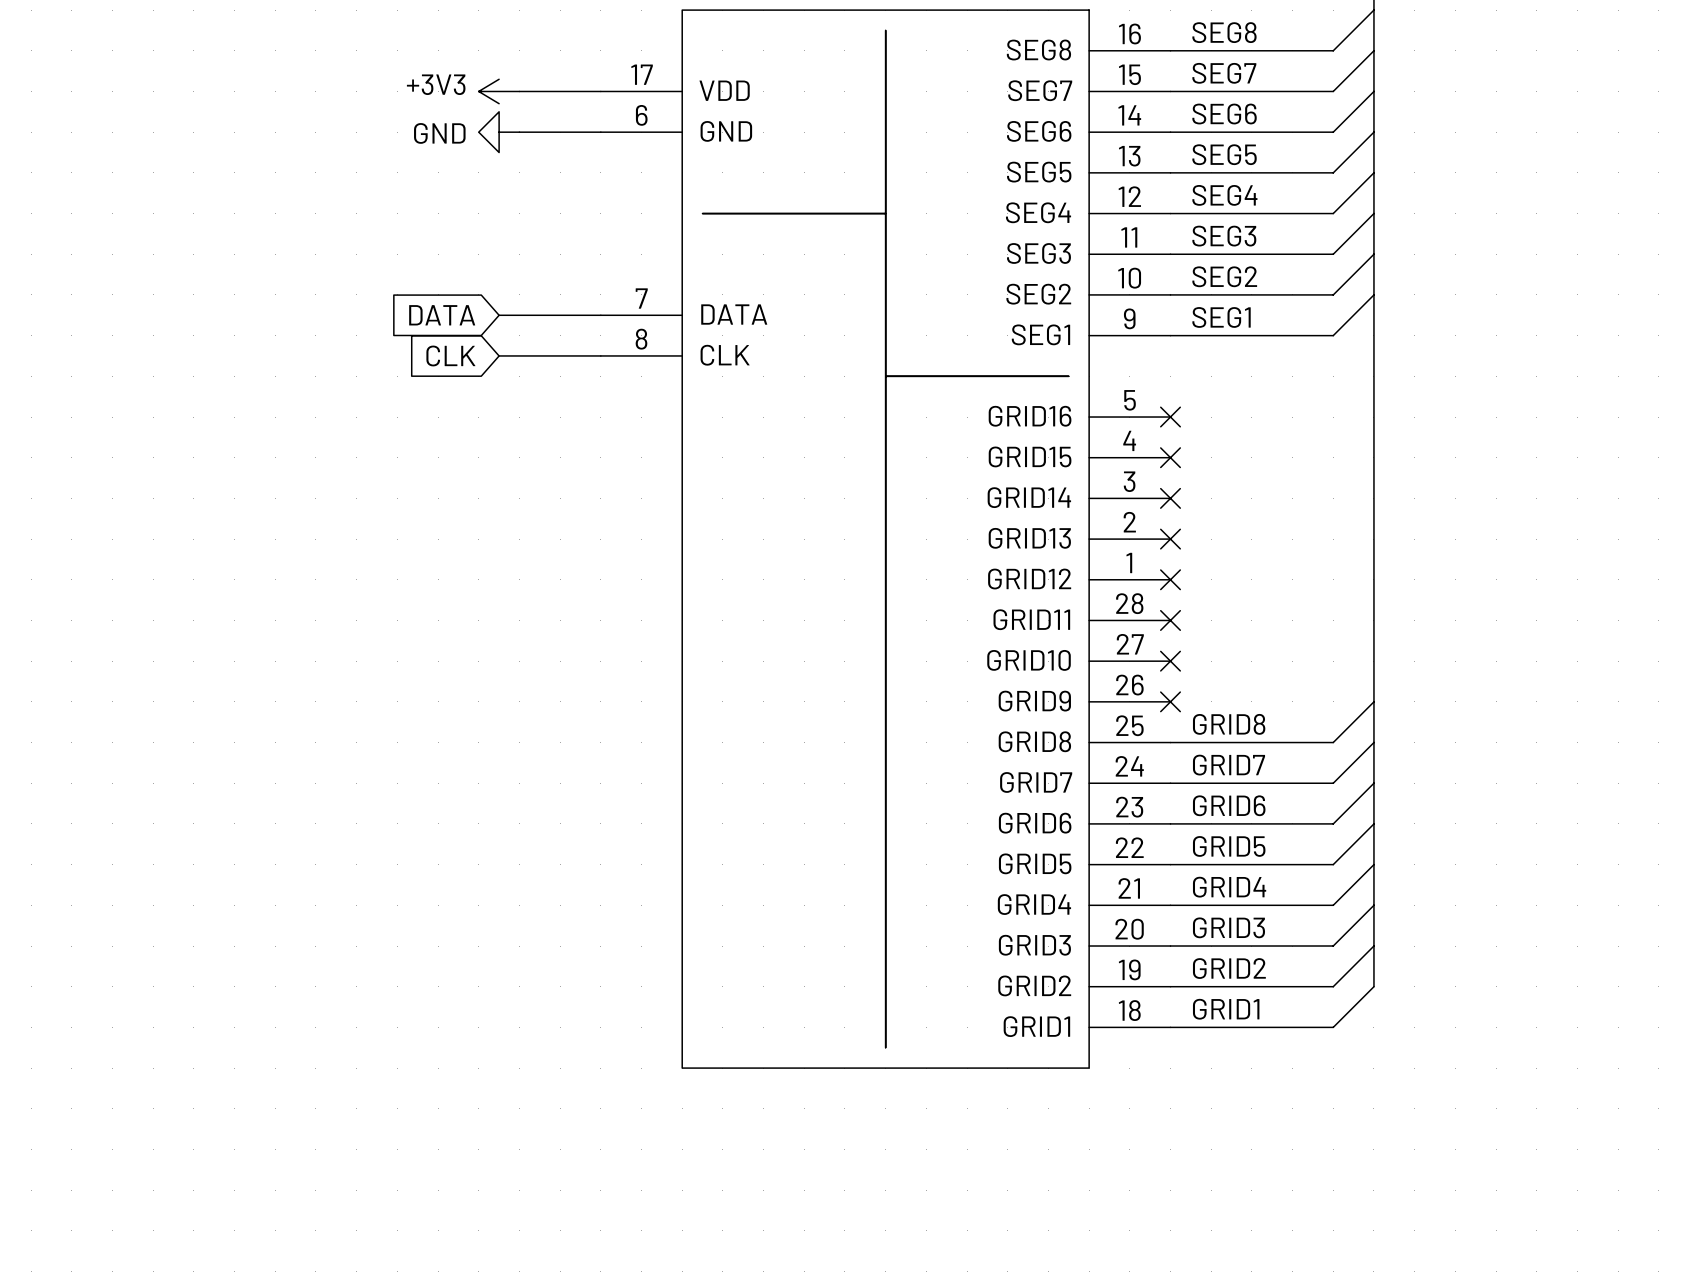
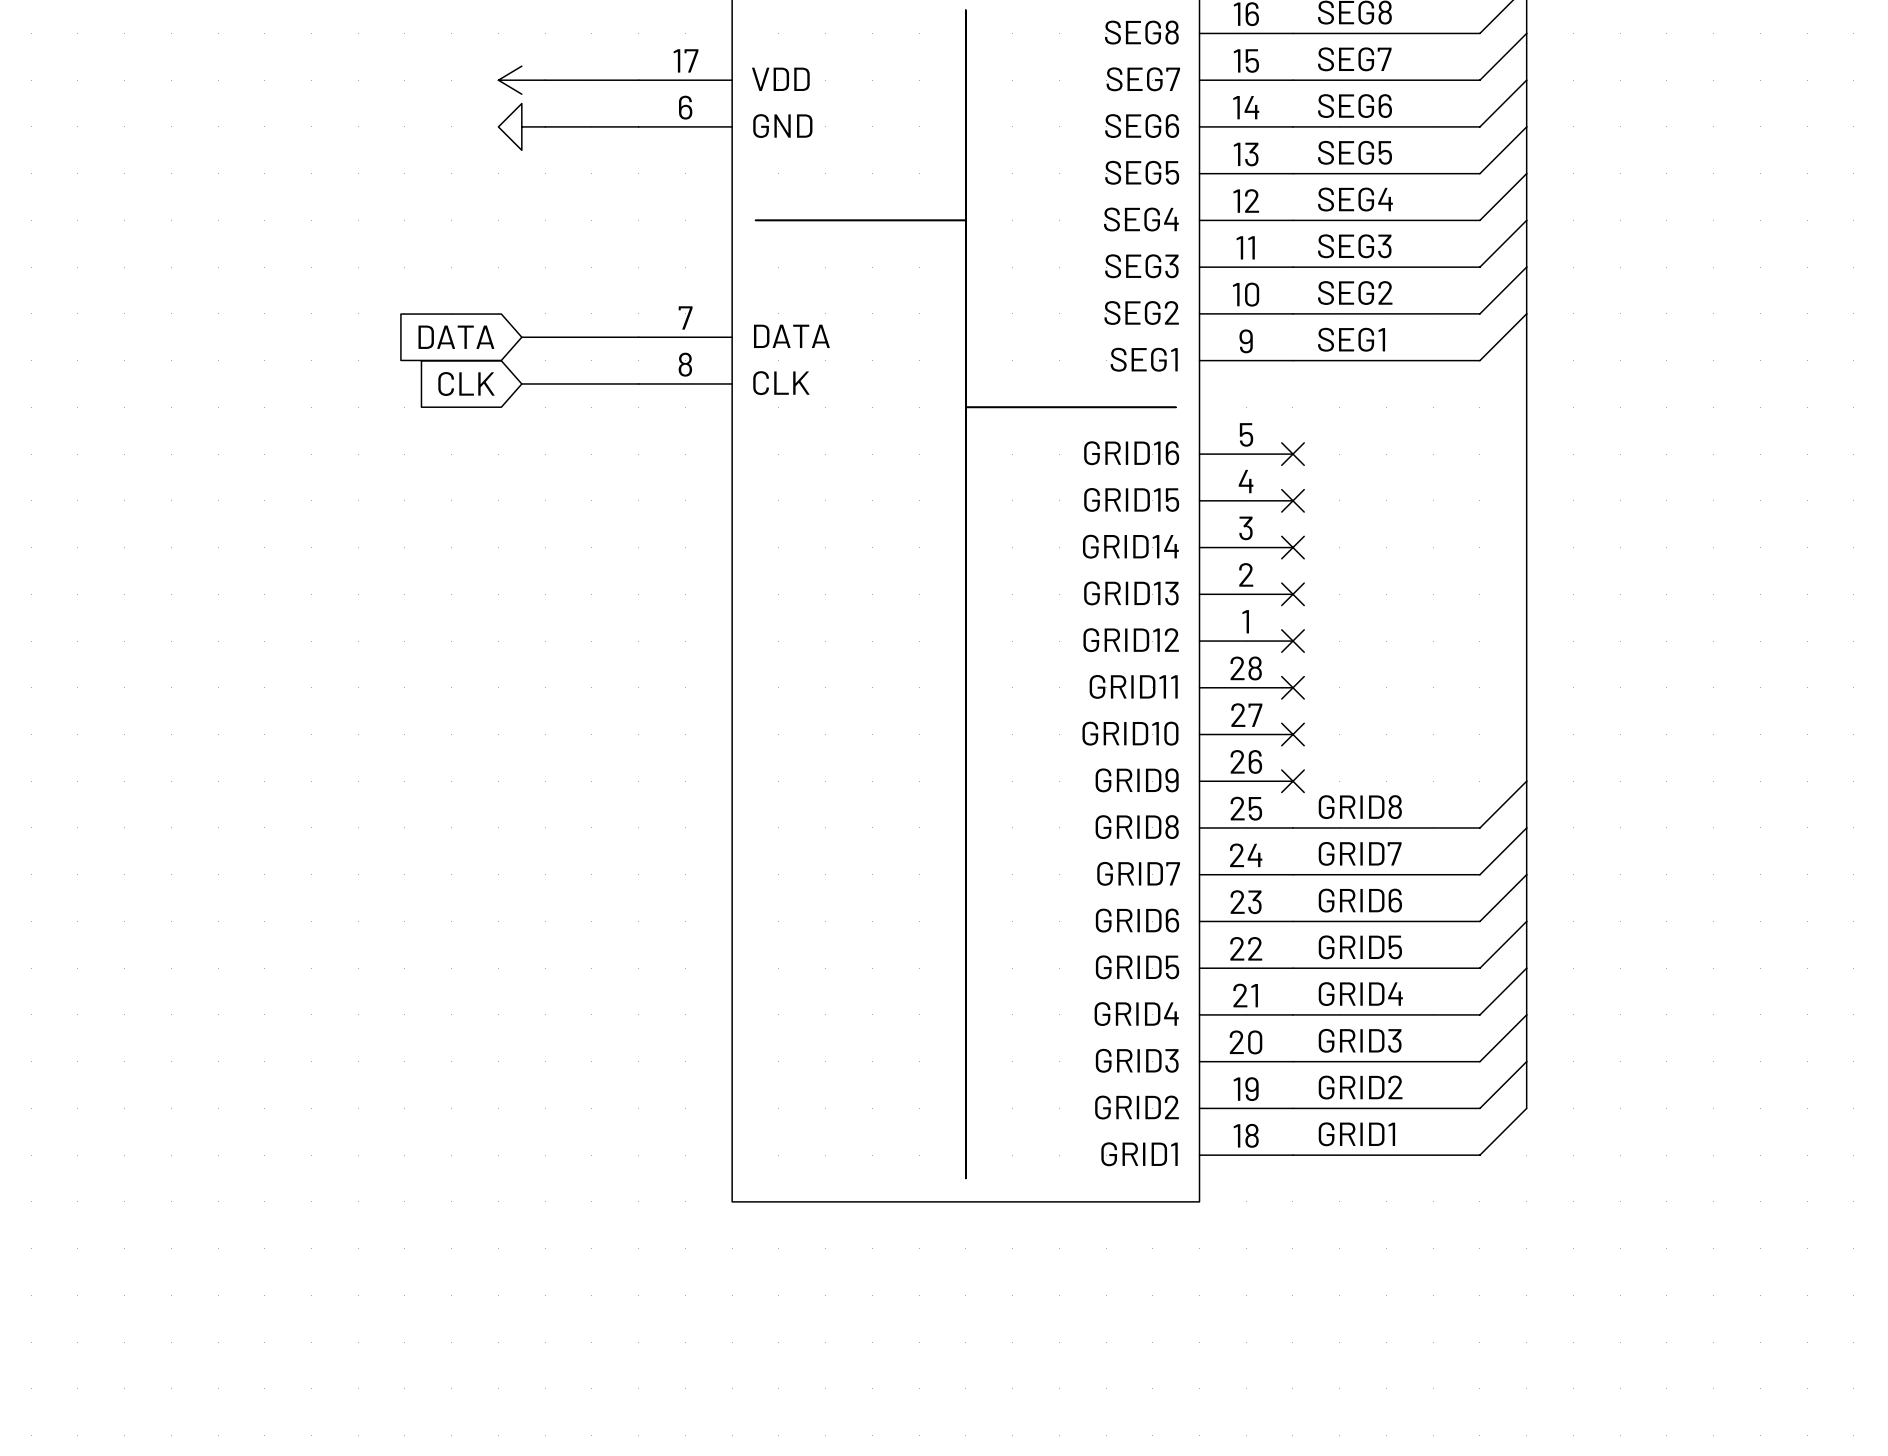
power symbol text: +3V3 (436, 84) -> none
power symbol text: GND (439, 133) -> none

